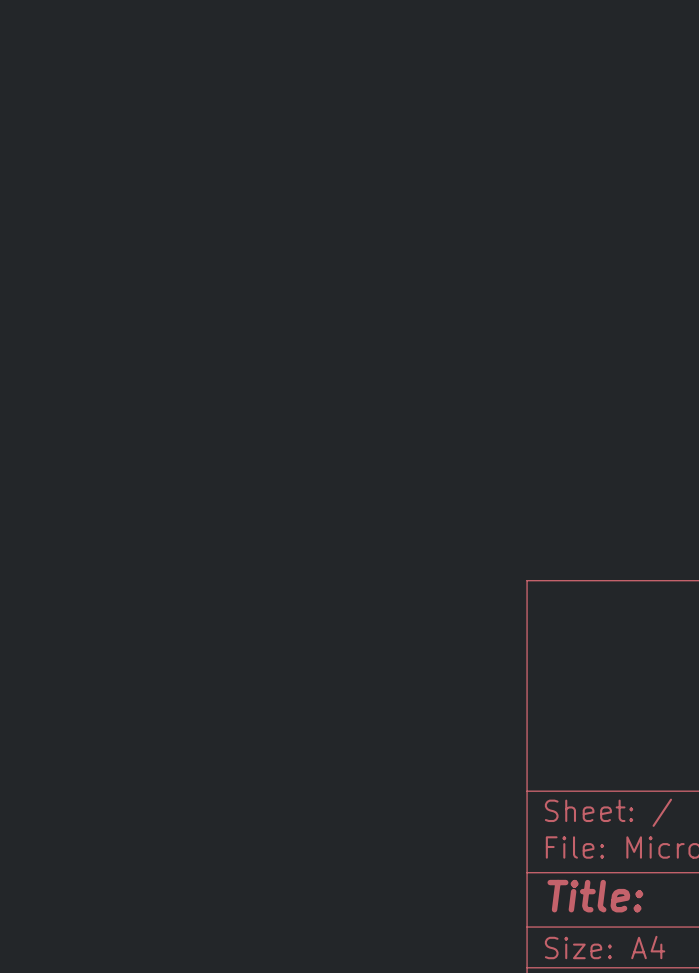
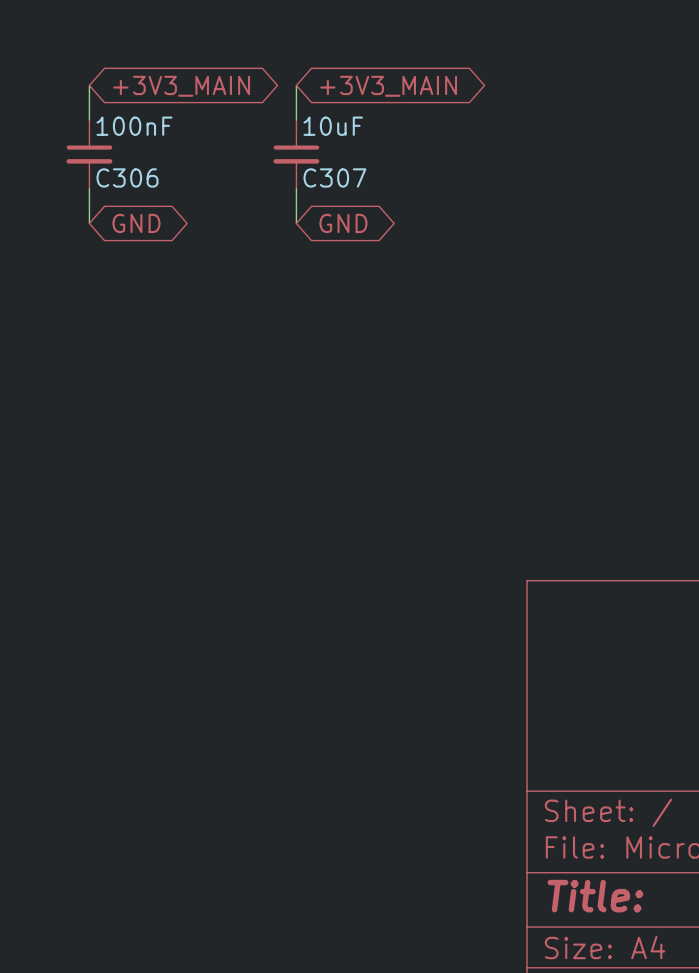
wire: none -> (89, 85) (89, 119)
wire: none -> (296, 85) (296, 119)
global label: none -> +3V3_MAIN (181, 86)
global label: none -> +3V3_MAIN (388, 86)
C306: none -> 100nF (89, 154)
C307: none -> 10uF (296, 154)
wire: none -> (89, 188) (89, 223)
wire: none -> (296, 188) (296, 223)
global label: none -> GND (136, 223)
global label: none -> GND (343, 223)

